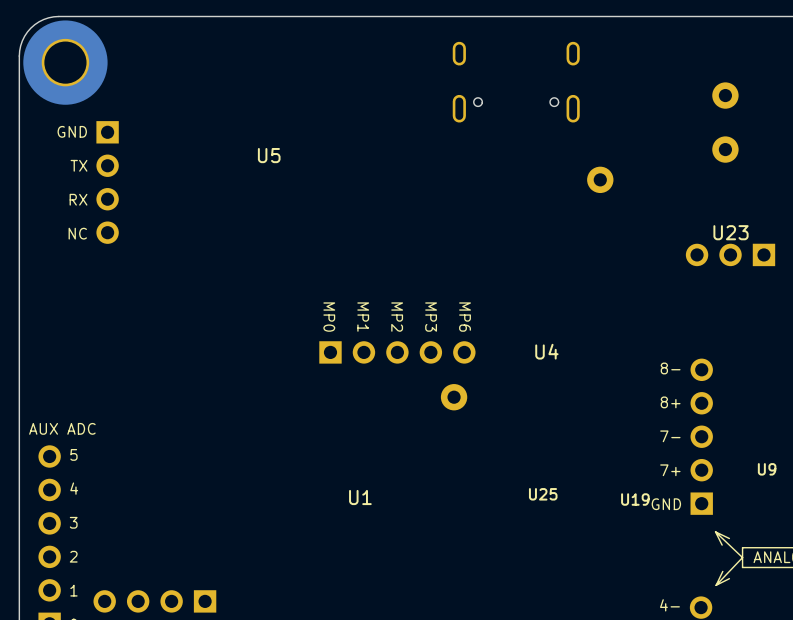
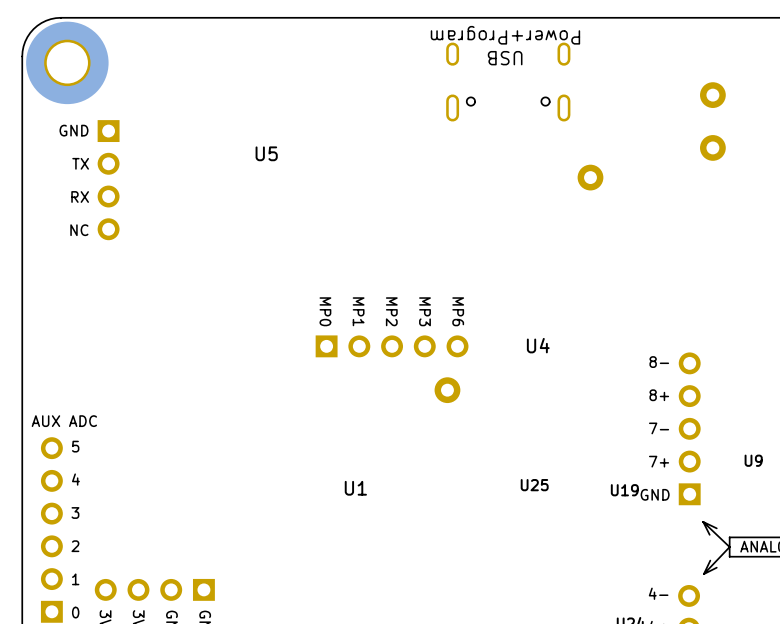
text: none -> Power+Program (505, 35)
text: none -> USB (505, 58)
U23: (730, 254) -> none

